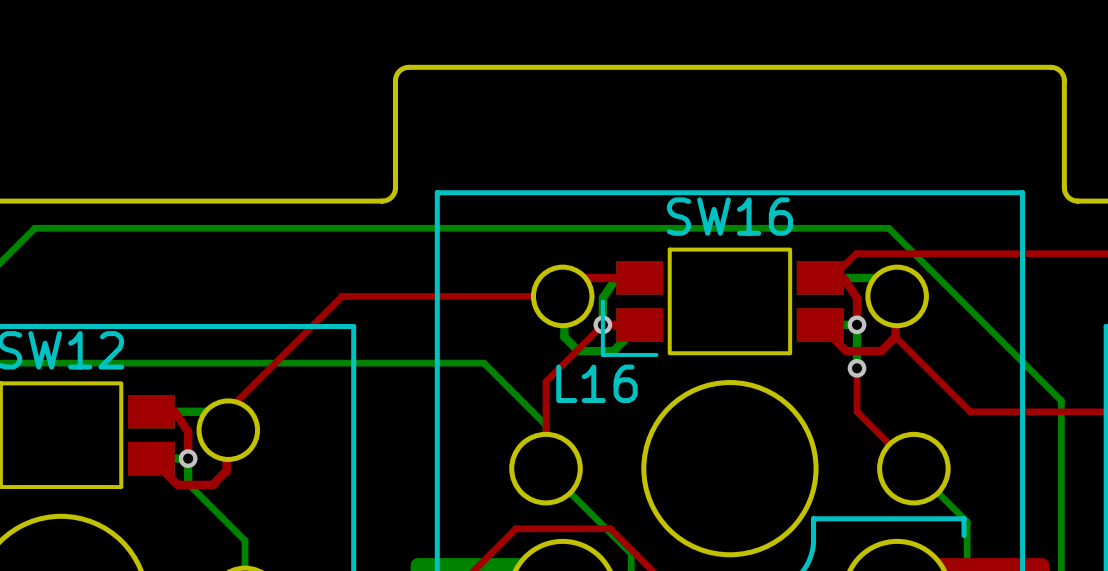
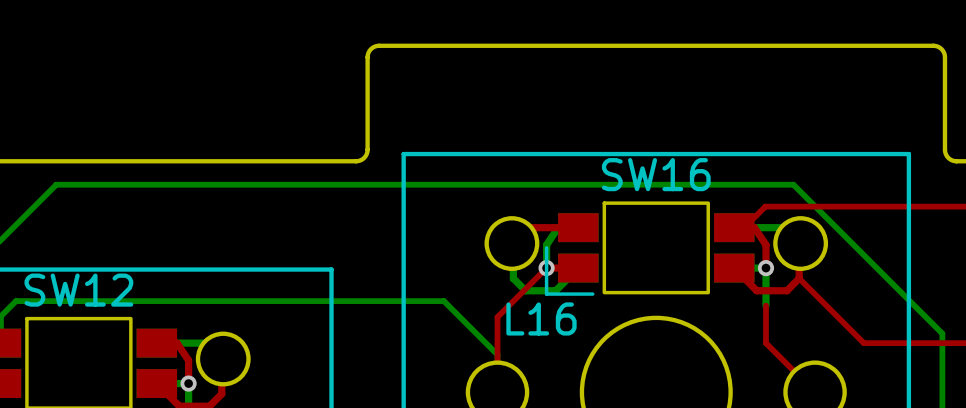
top track: (564, 278) (562, 279) (562, 296) (341, 296) (226, 411) -> none
via: (857, 368) -> none

